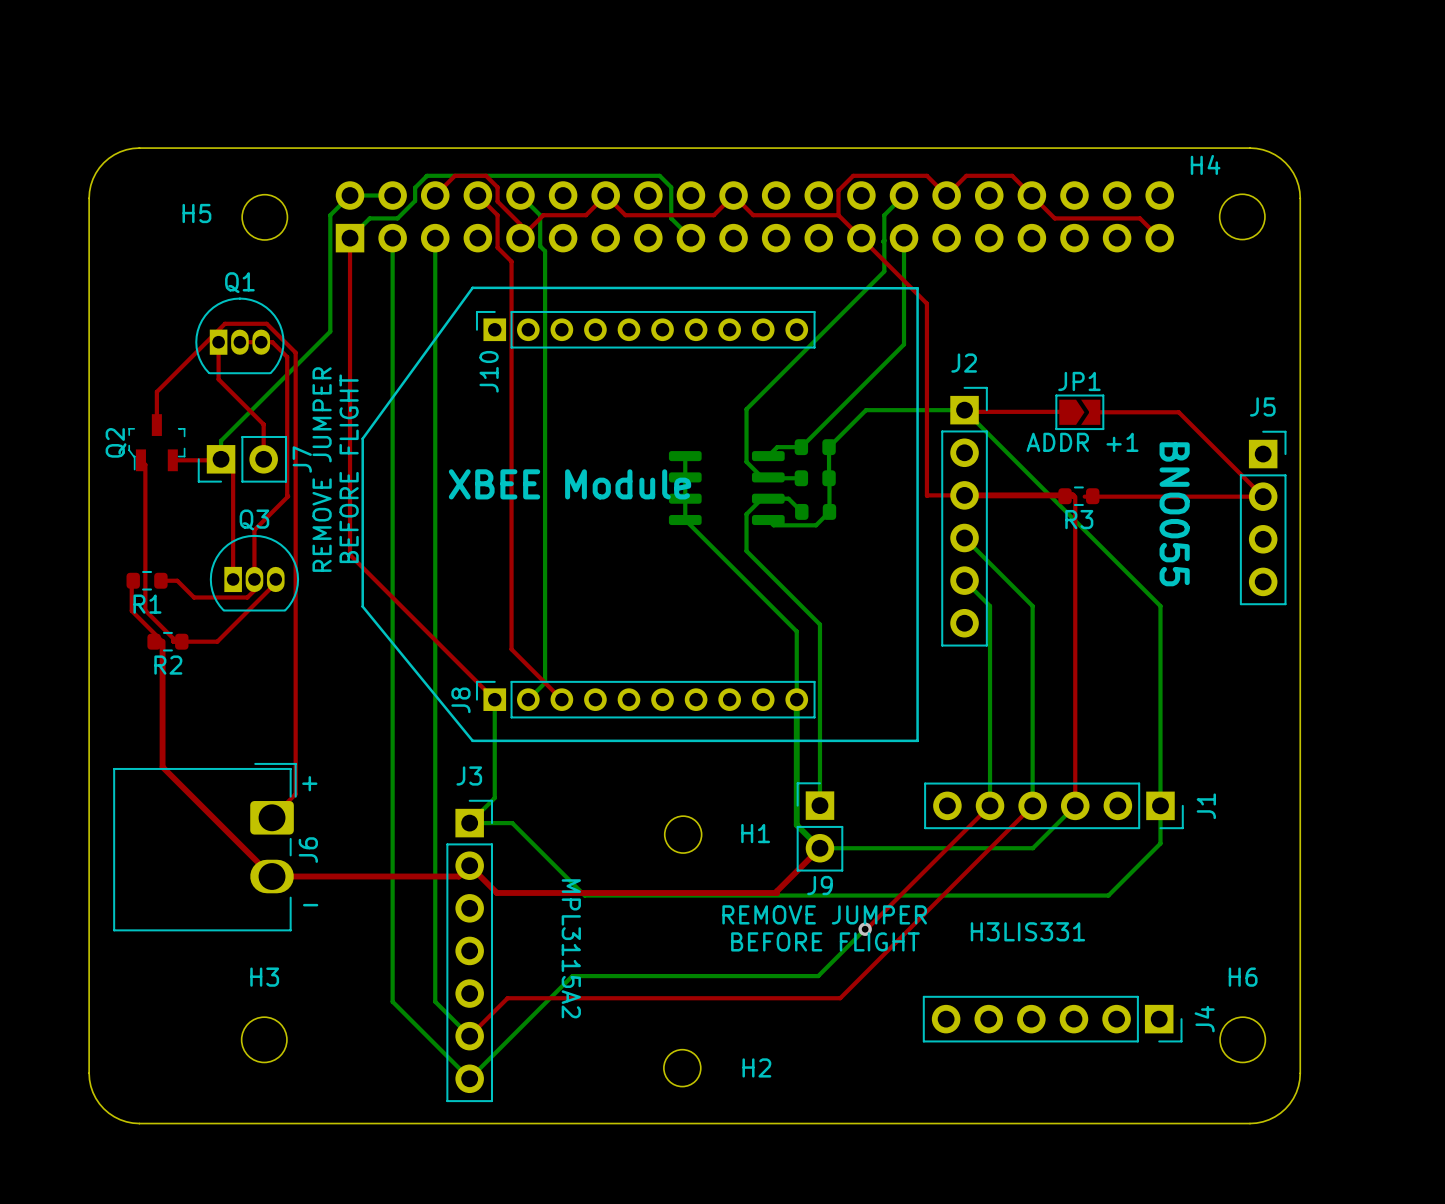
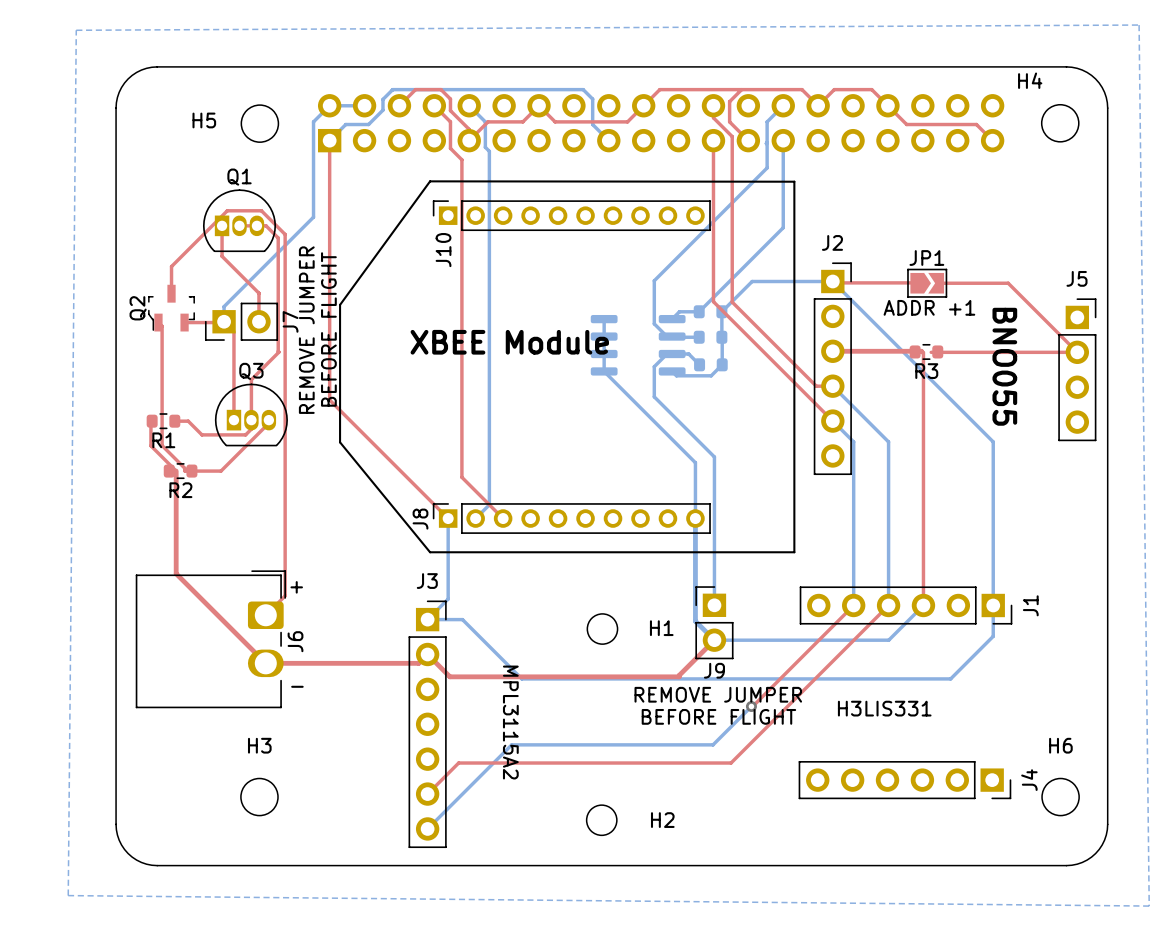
bottom zone outline: none -> (1139, 25) (76, 30) (68, 895) (1149, 906) (1139, 25)
top track: (733, 195) (753, 215) (838, 215) -> (643, 105) (659, 89) (741, 89)
top track: none -> (713, 105) (713, 117) (732, 136) (732, 302) (816, 386) (832, 386)
bottom track: (392, 238) (392, 1001) (469, 1078) -> none
bottom track: (435, 238) (435, 1001) (469, 1036) -> none
top track: none -> (713, 140) (713, 301) (832, 421)
top track: (861, 238) (926, 303) (926, 495) (964, 495) -> none

